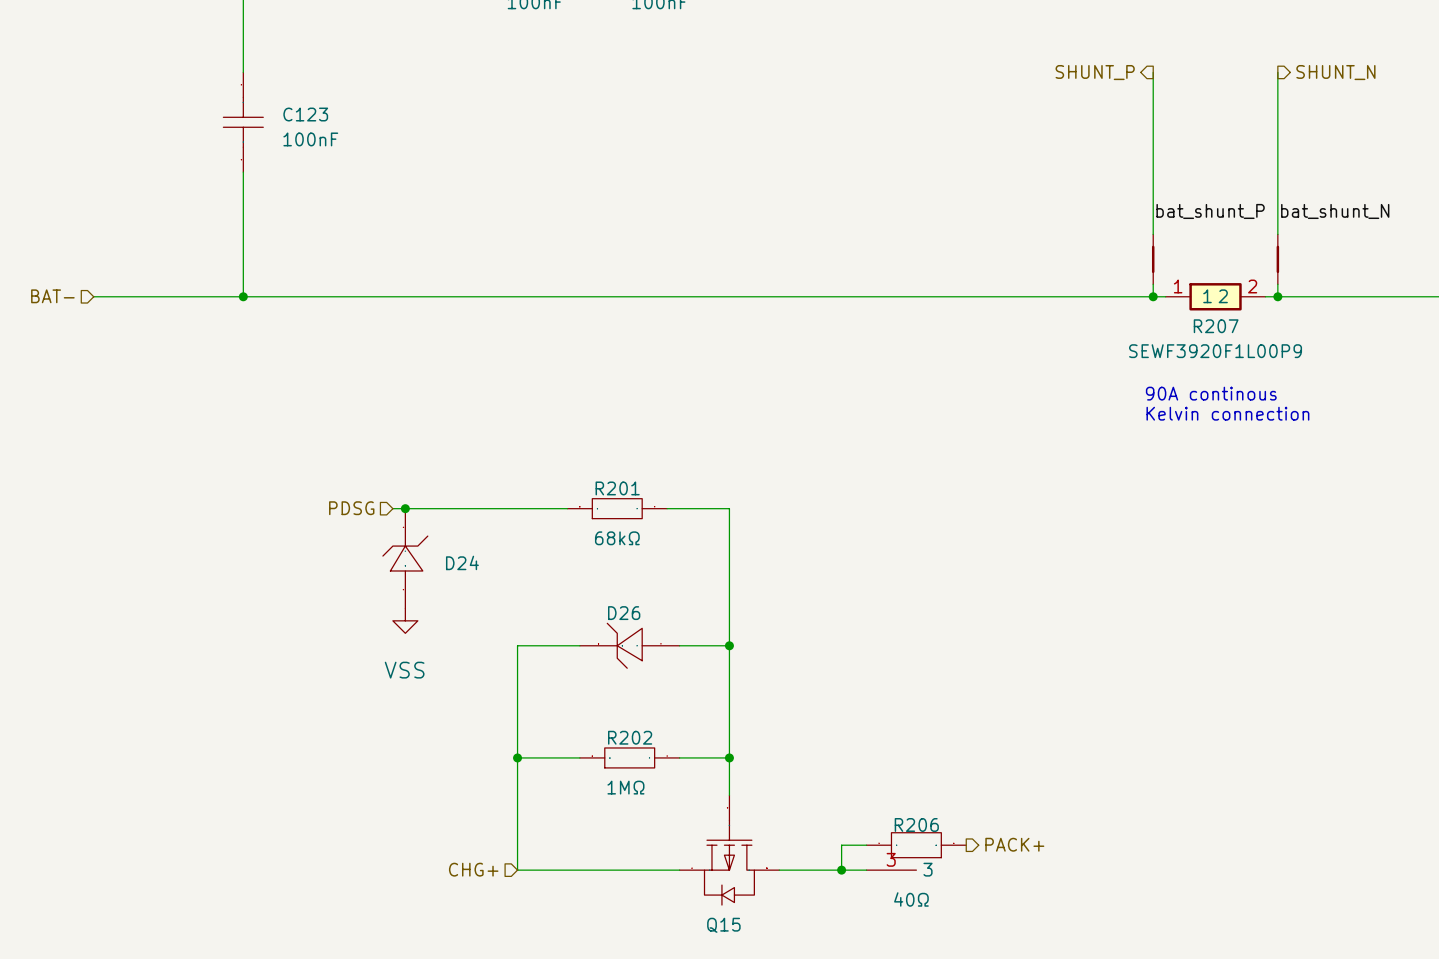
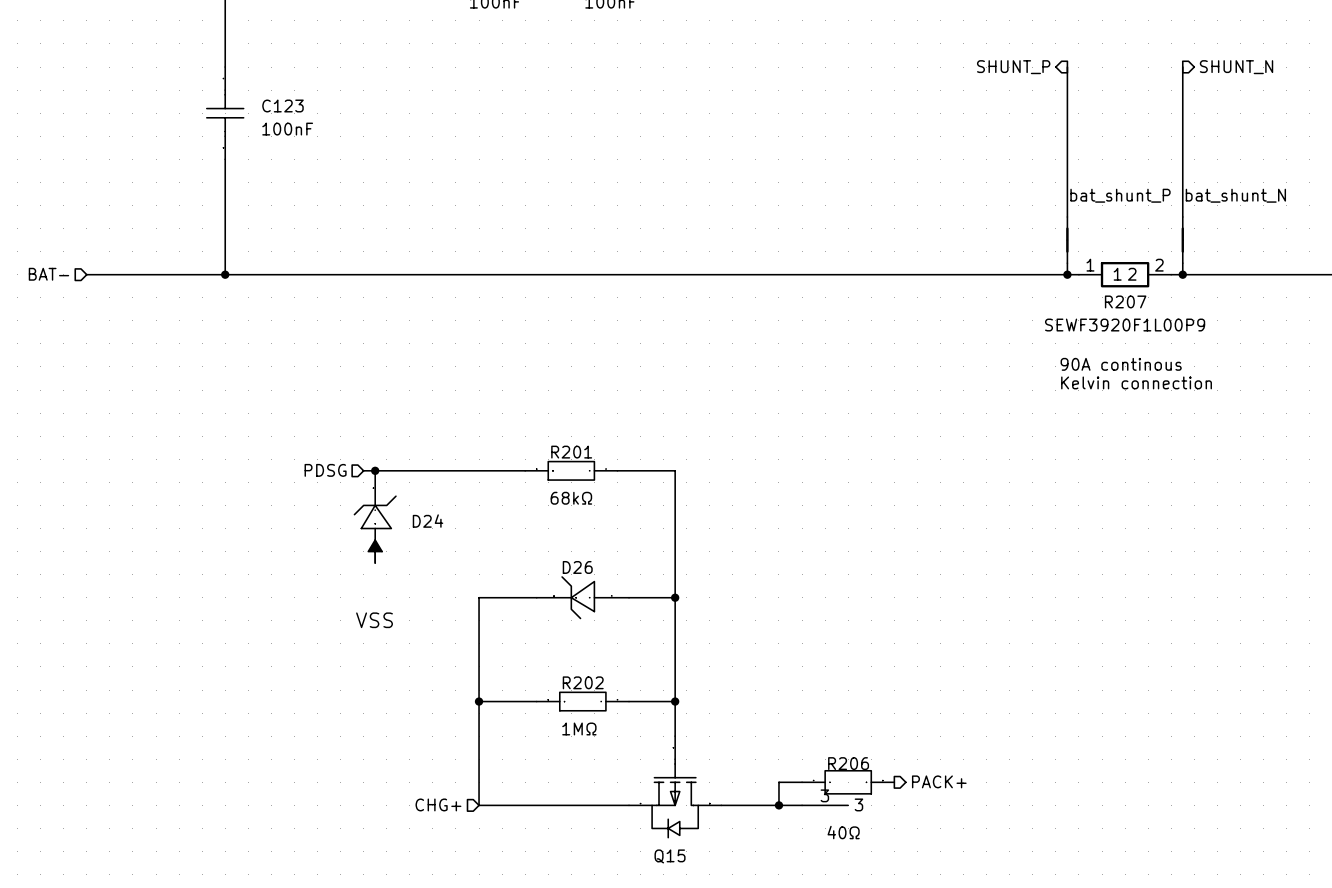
power symbol: none -> VSS (375, 551)
power symbol: VSS (405, 620) -> none

